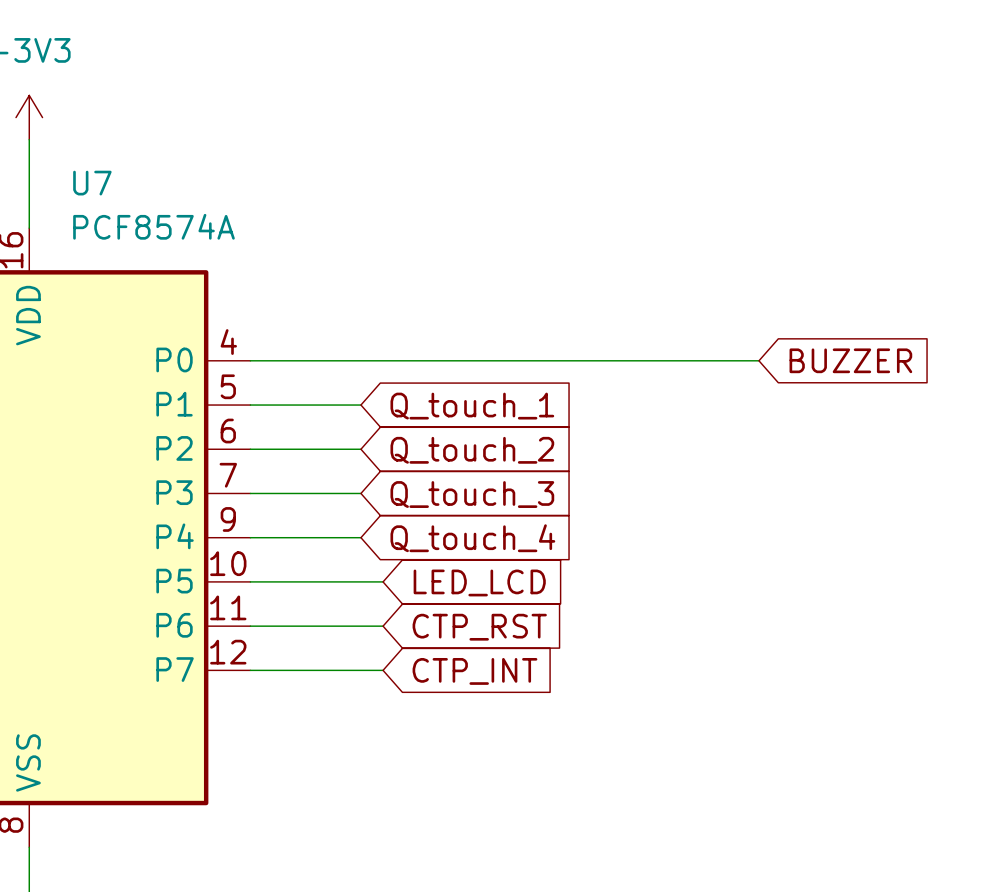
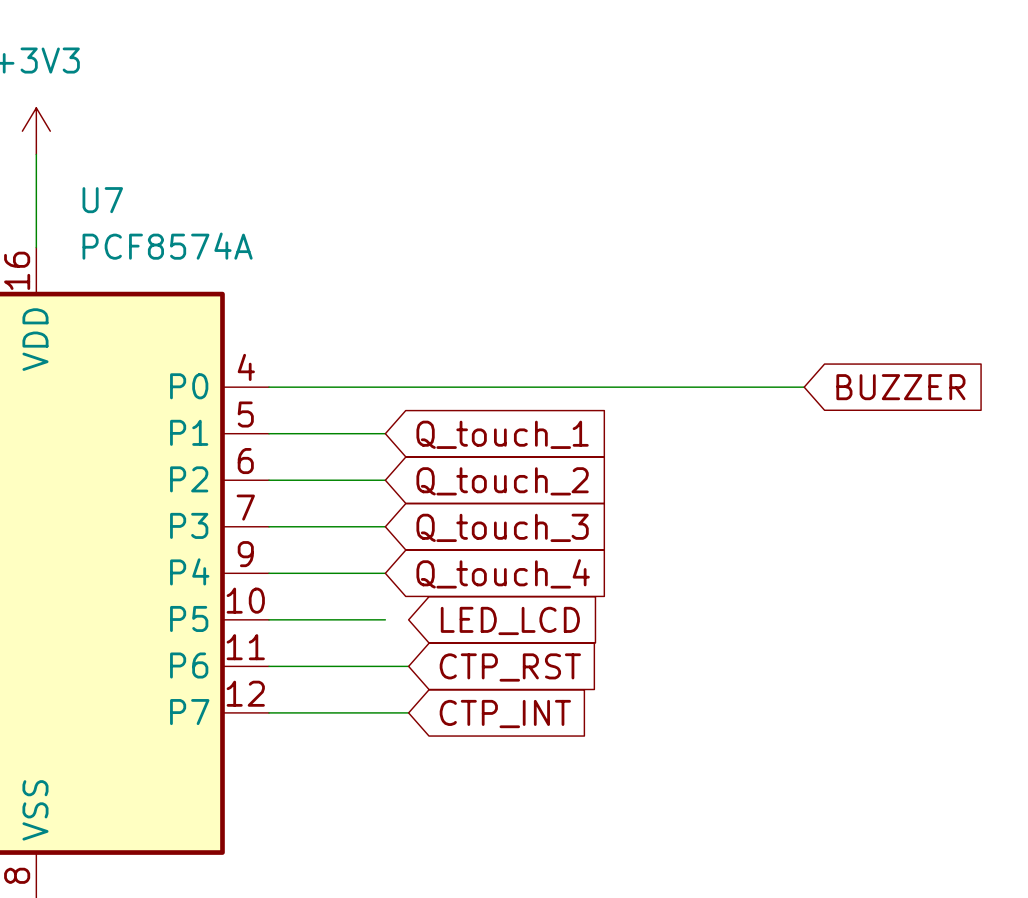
wire: (360, 581) (383, 581) -> none

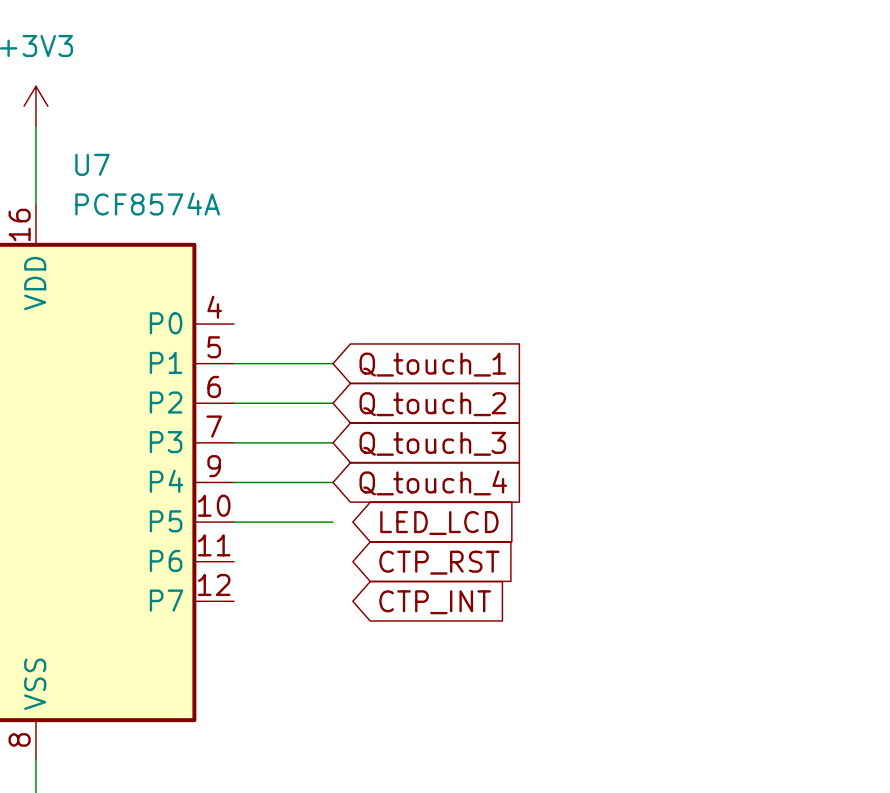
wire: (269, 387) (804, 387) -> none
global label: BUZZER (900, 387) -> none
wire: (269, 666) (408, 666) -> none
wire: (269, 712) (408, 712) -> none

